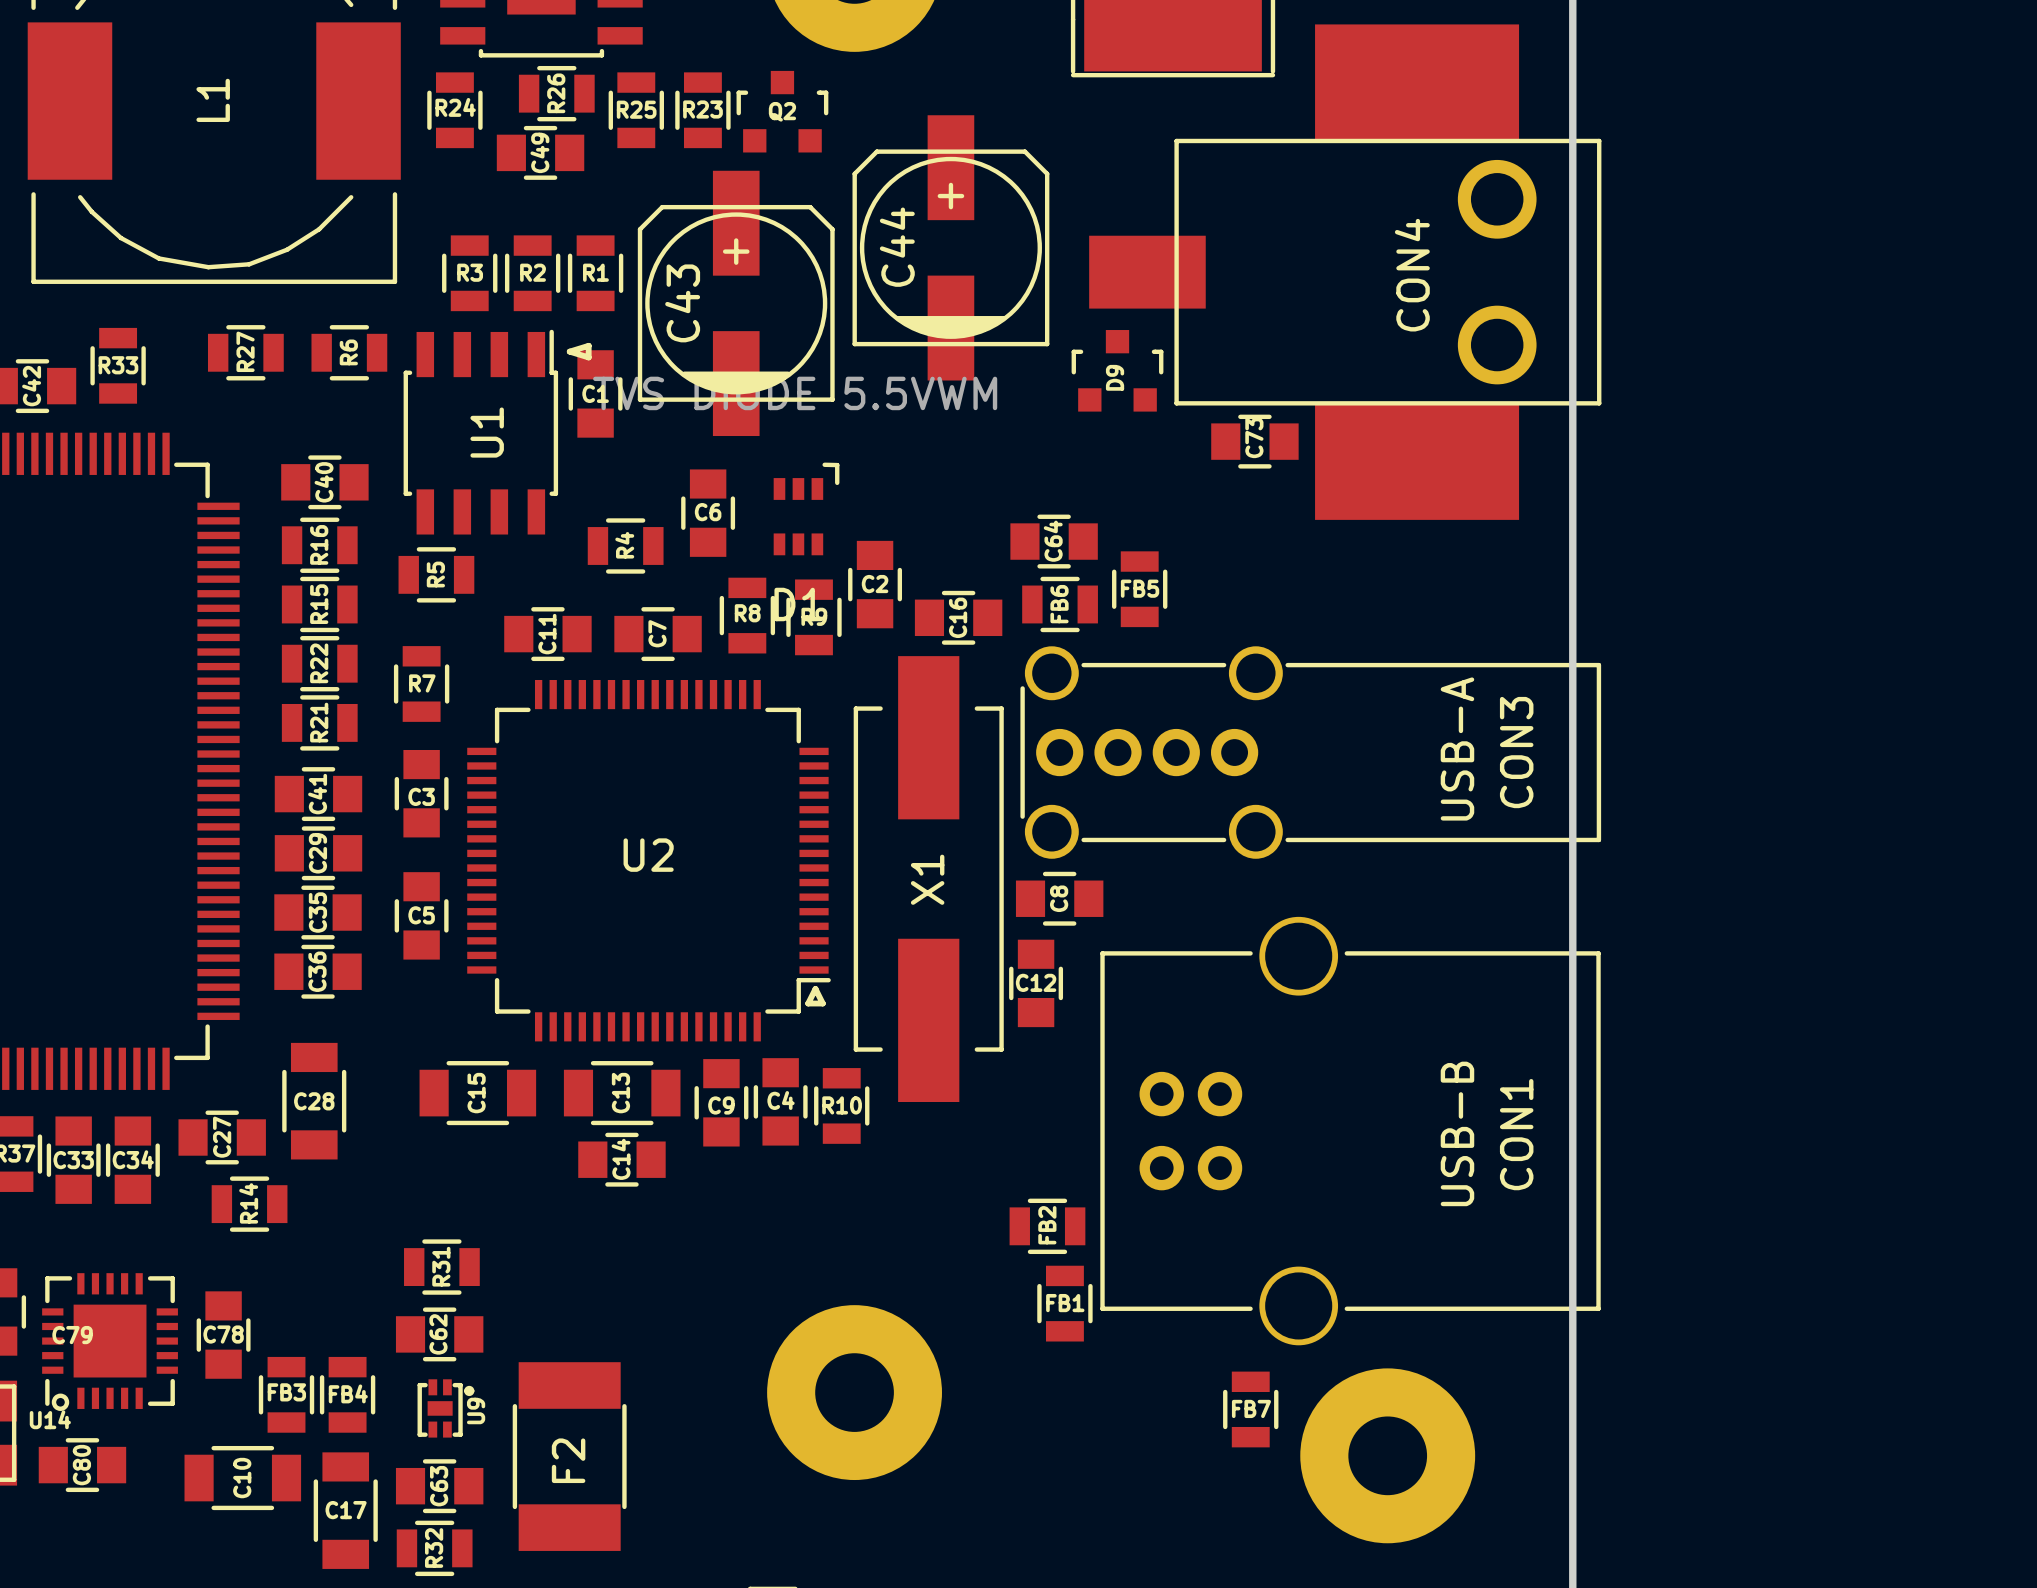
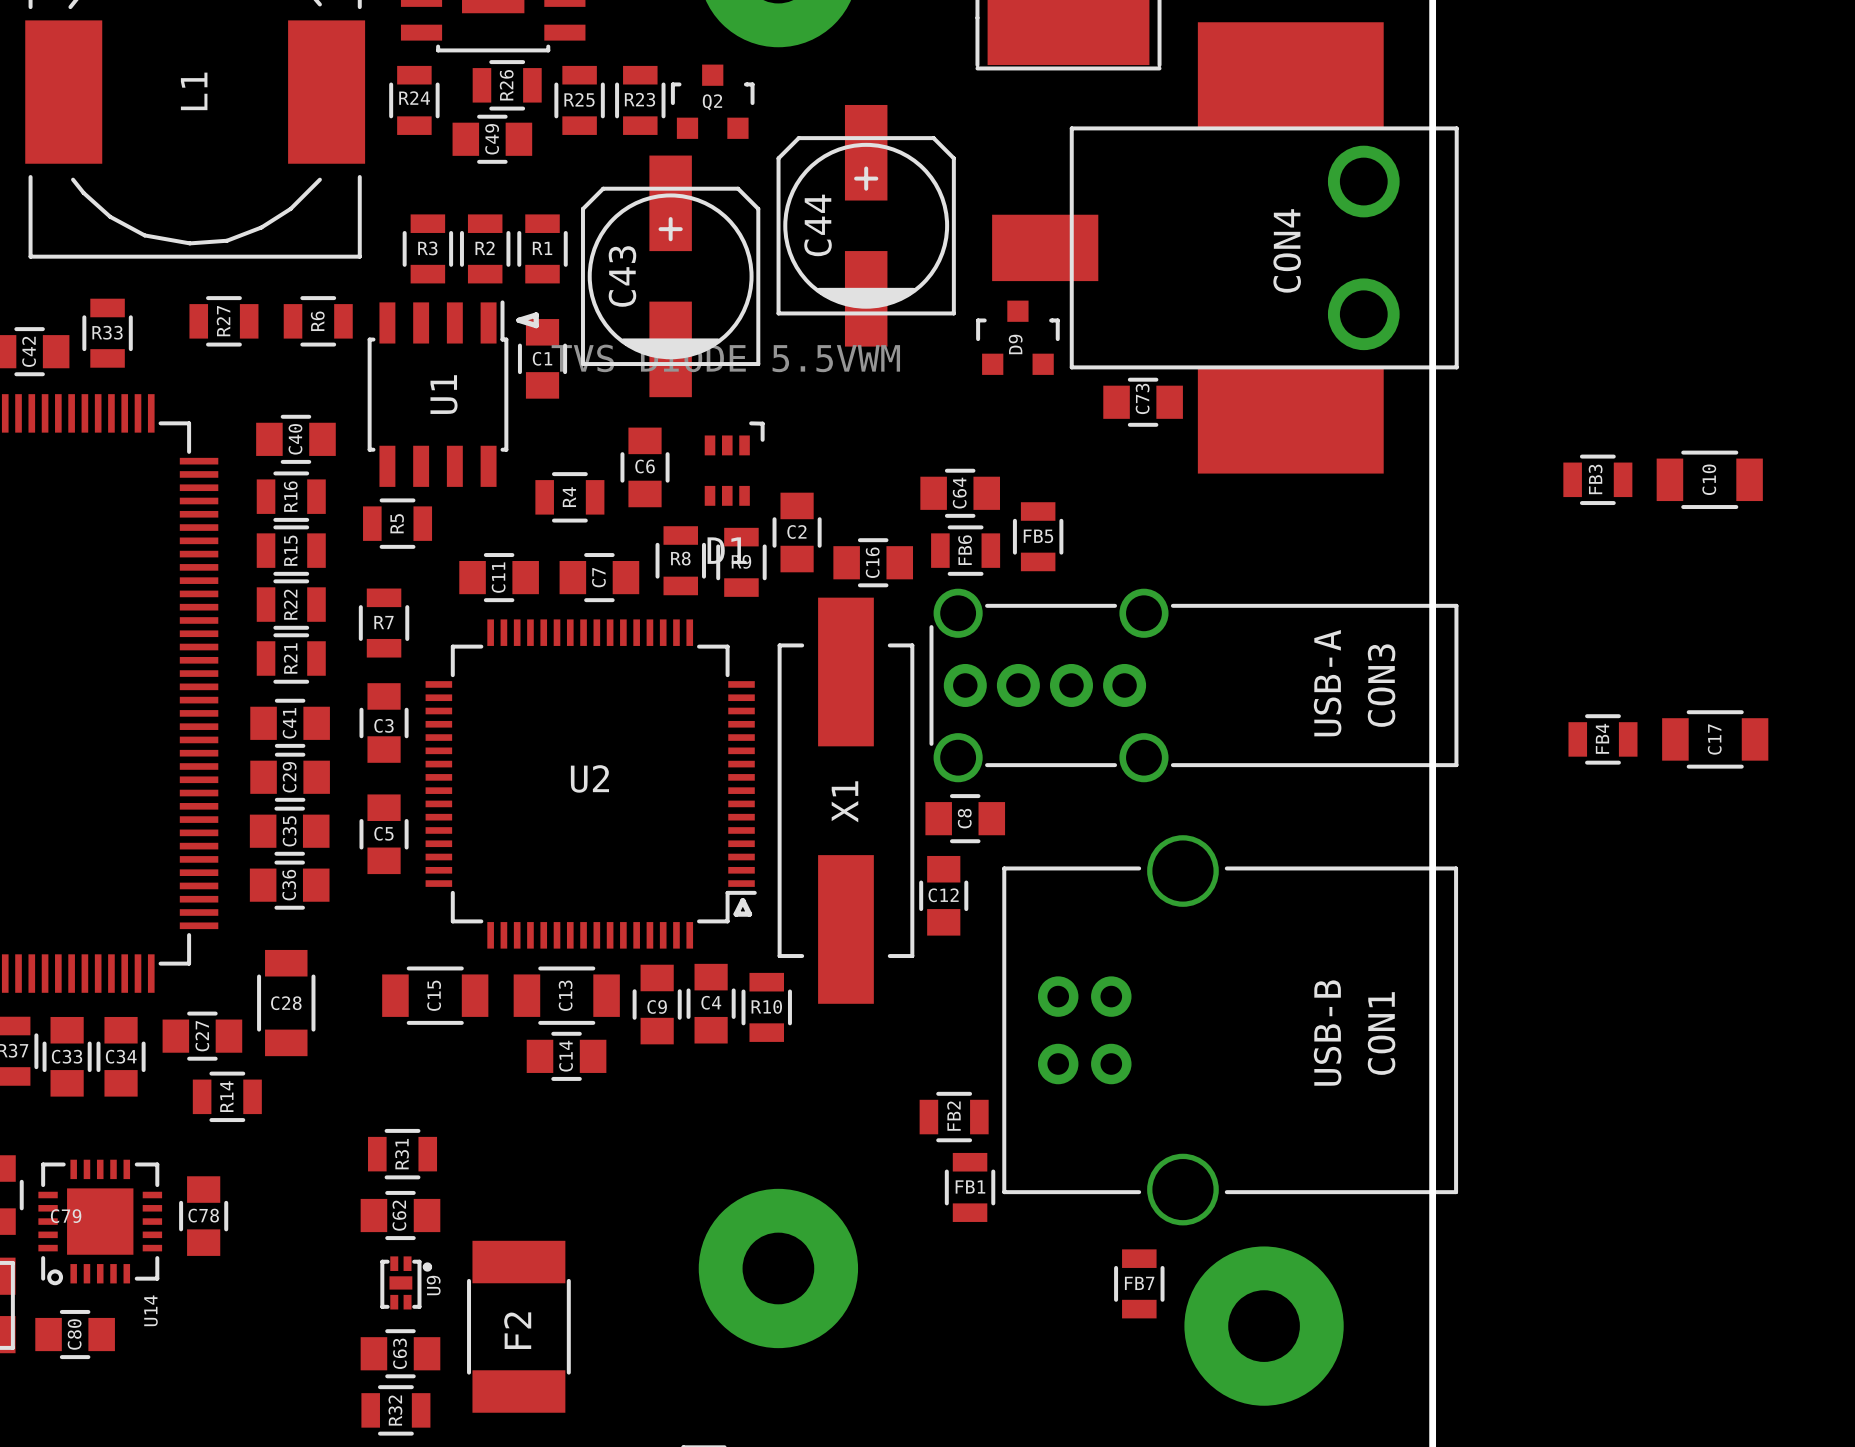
FB3 rotation: 0° (286, 1394) -> 90° clockwise (1597, 479)
FB3 position: (286, 1394) -> (1597, 479)
FB4 rotation: 0° (347, 1394) -> 90° clockwise (1602, 739)
FB4 position: (347, 1394) -> (1602, 739)
U14 name rotation: 0° (50, 1419) -> 90° counterclockwise (150, 1310)
U14 name position: U14 (50, 1419) -> U14 (150, 1310)
C10 position: (242, 1478) -> (1709, 479)
C17 rotation: 0° (345, 1510) -> 90° clockwise (1715, 739)
C17 position: (345, 1510) -> (1715, 739)

